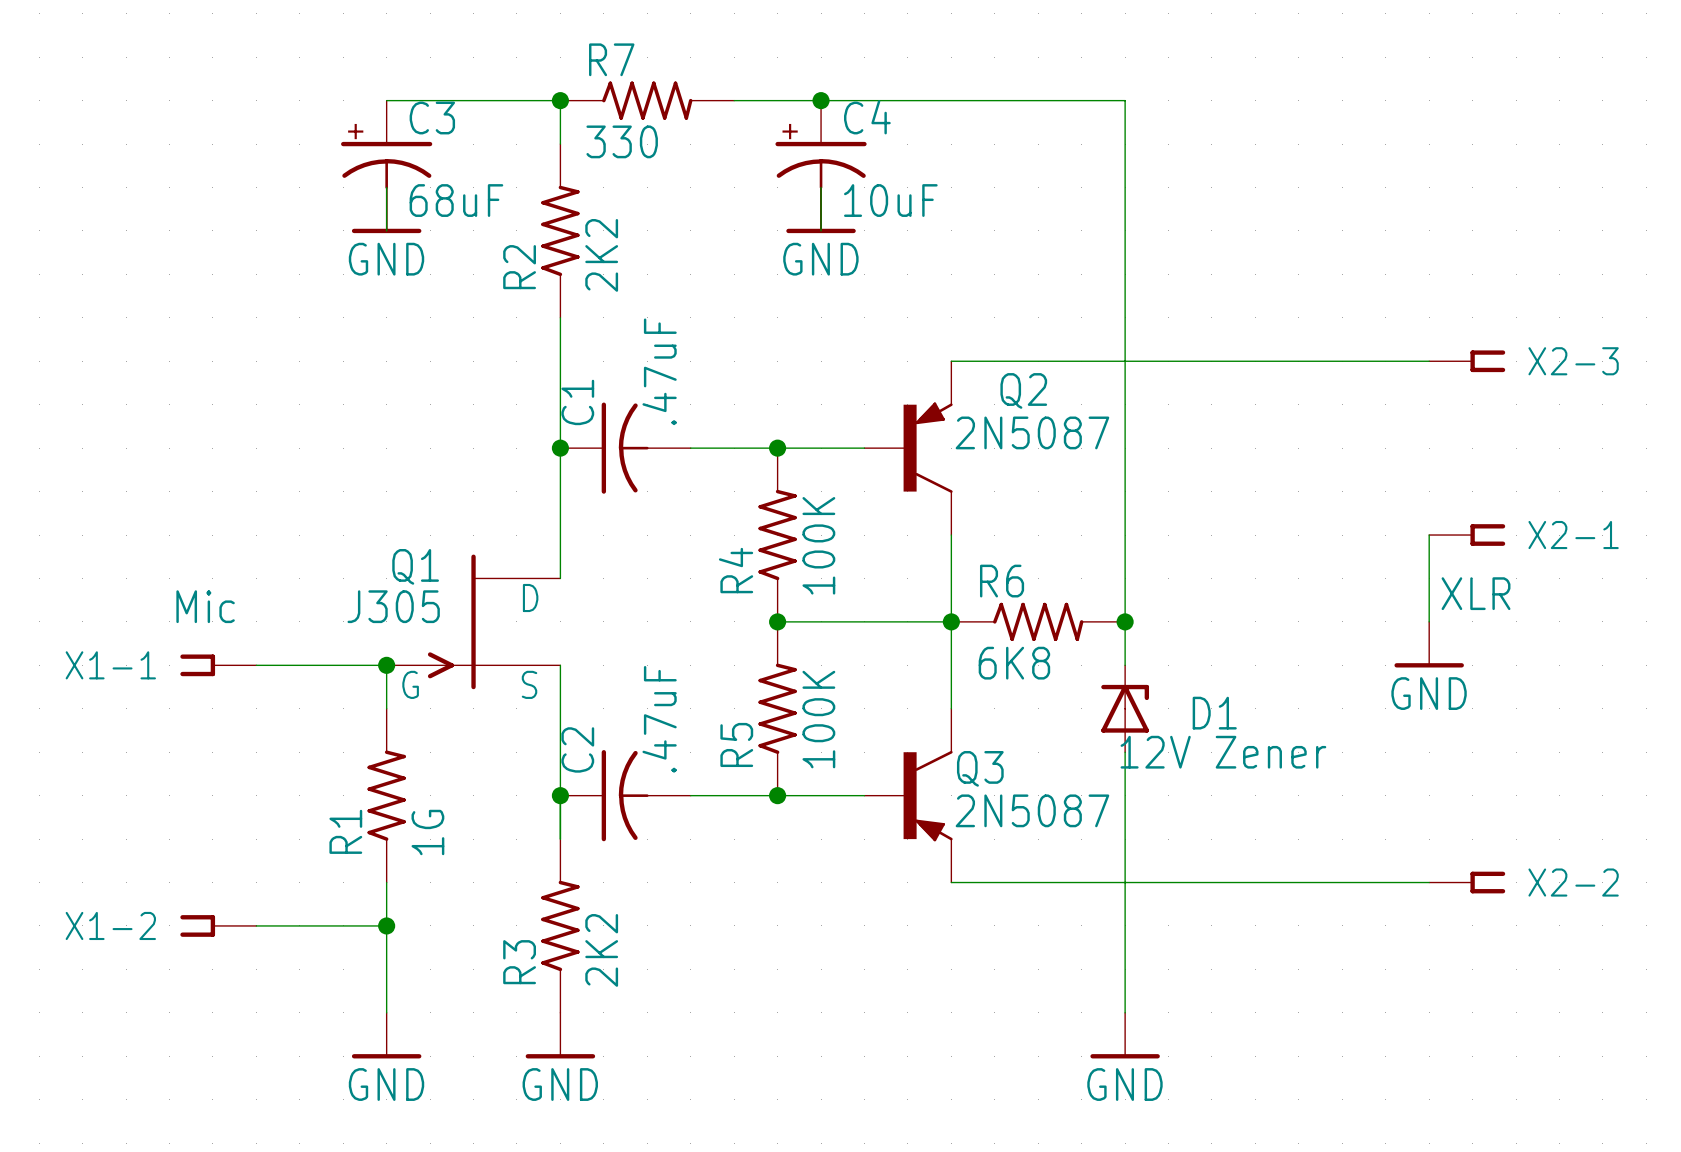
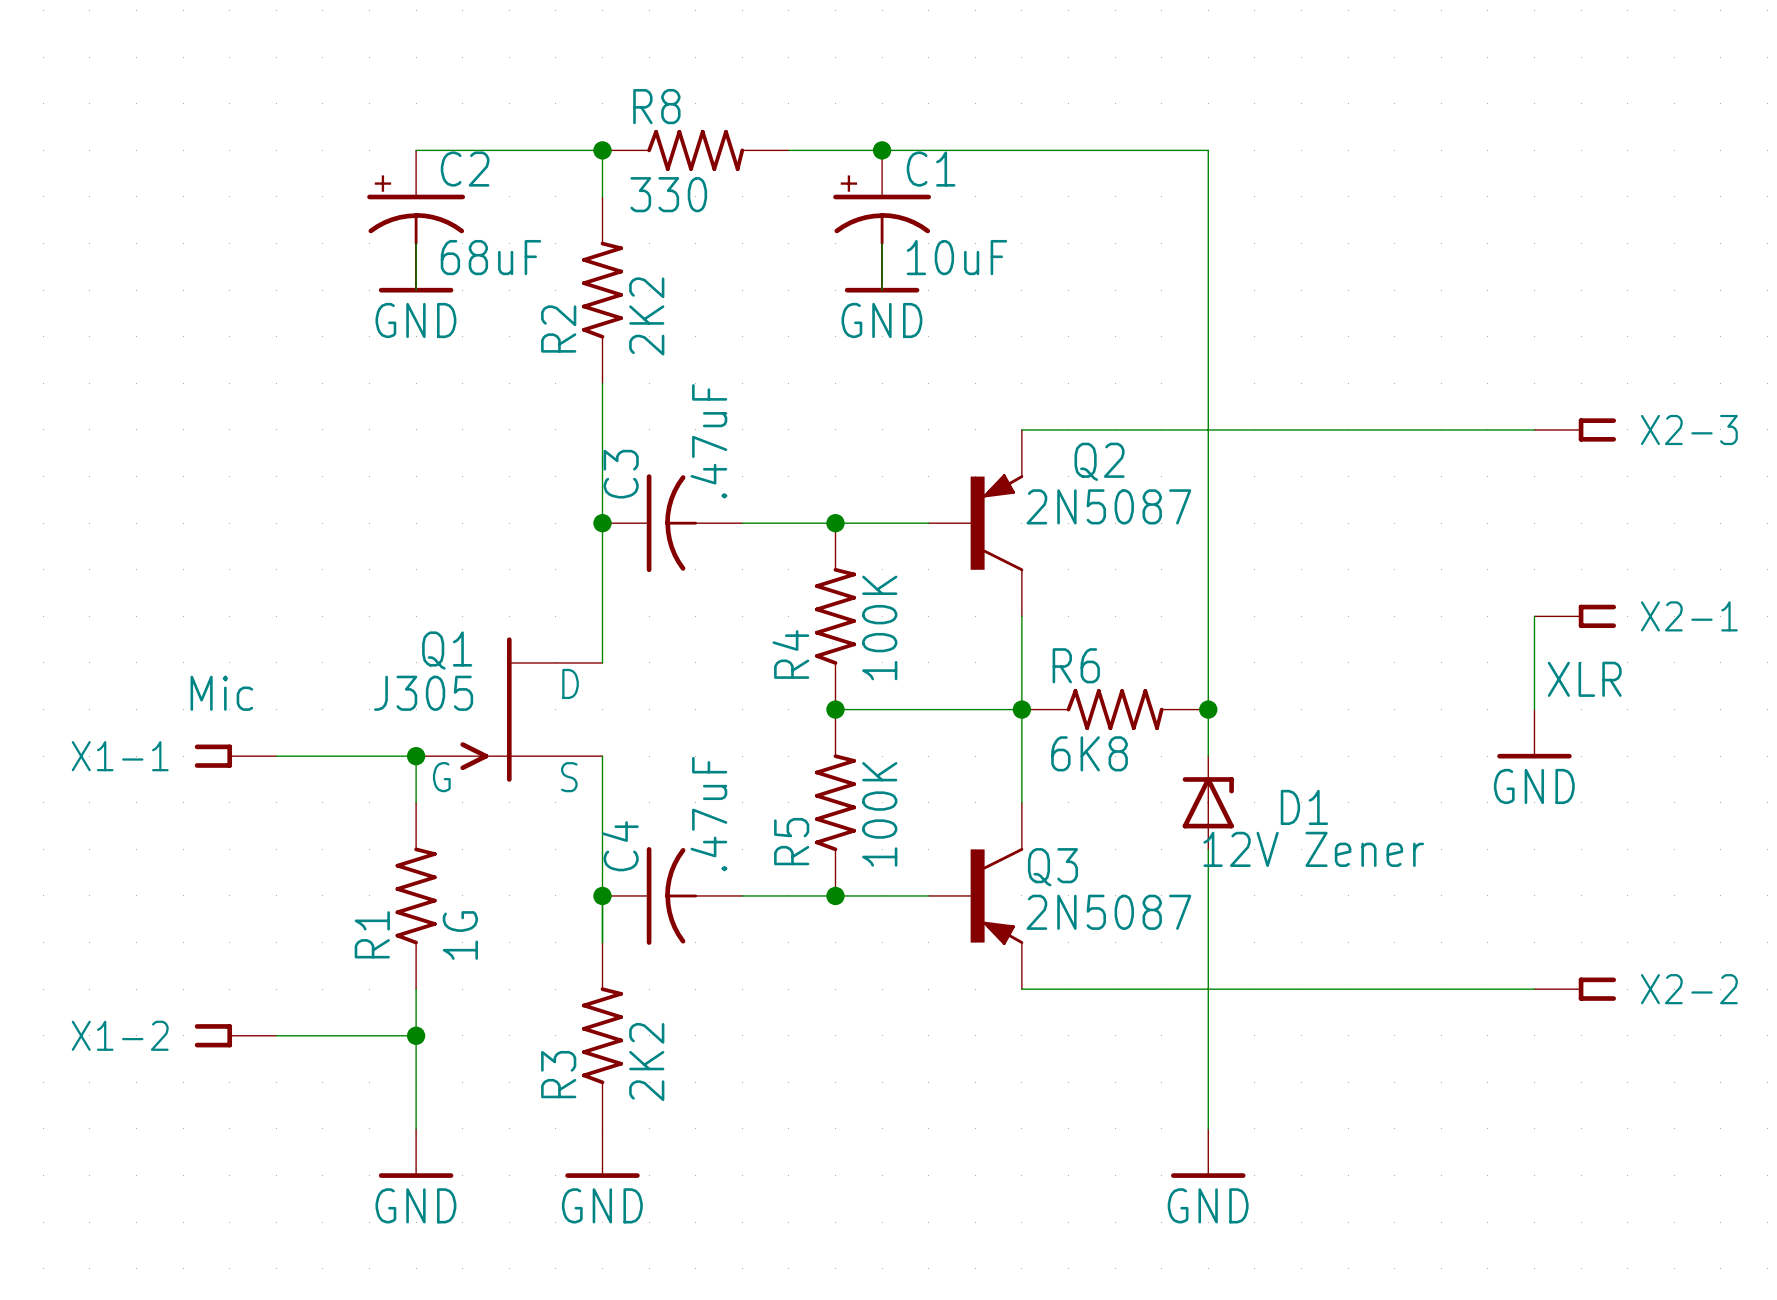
R7 name: R7 (611, 59) -> R8 (656, 106)
C4 name: C4 (867, 117) -> C1 (931, 169)
C3 name: C3 (432, 118) -> C2 (465, 169)
C1 name: C1 (577, 402) -> C3 (621, 474)
C2 name: C2 (577, 749) -> C4 (620, 846)

